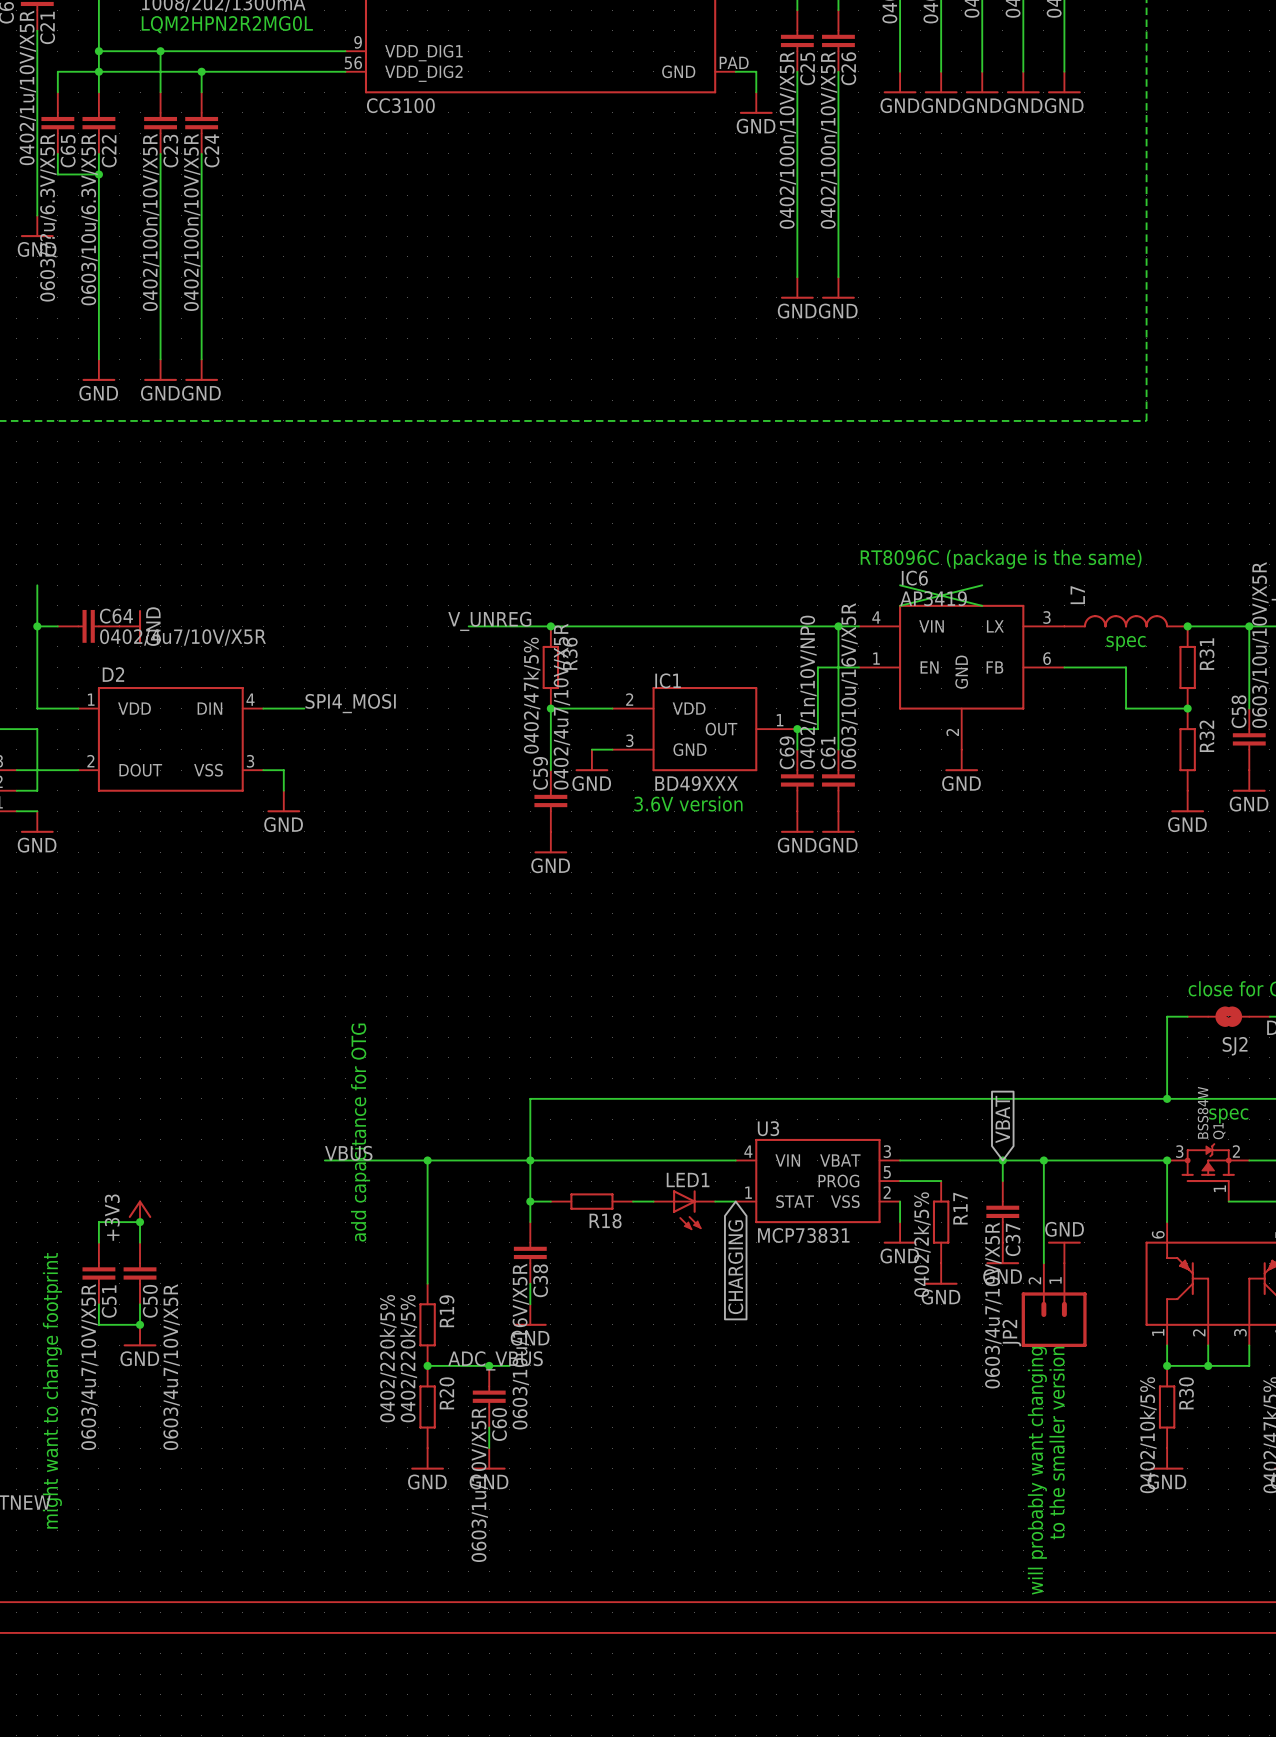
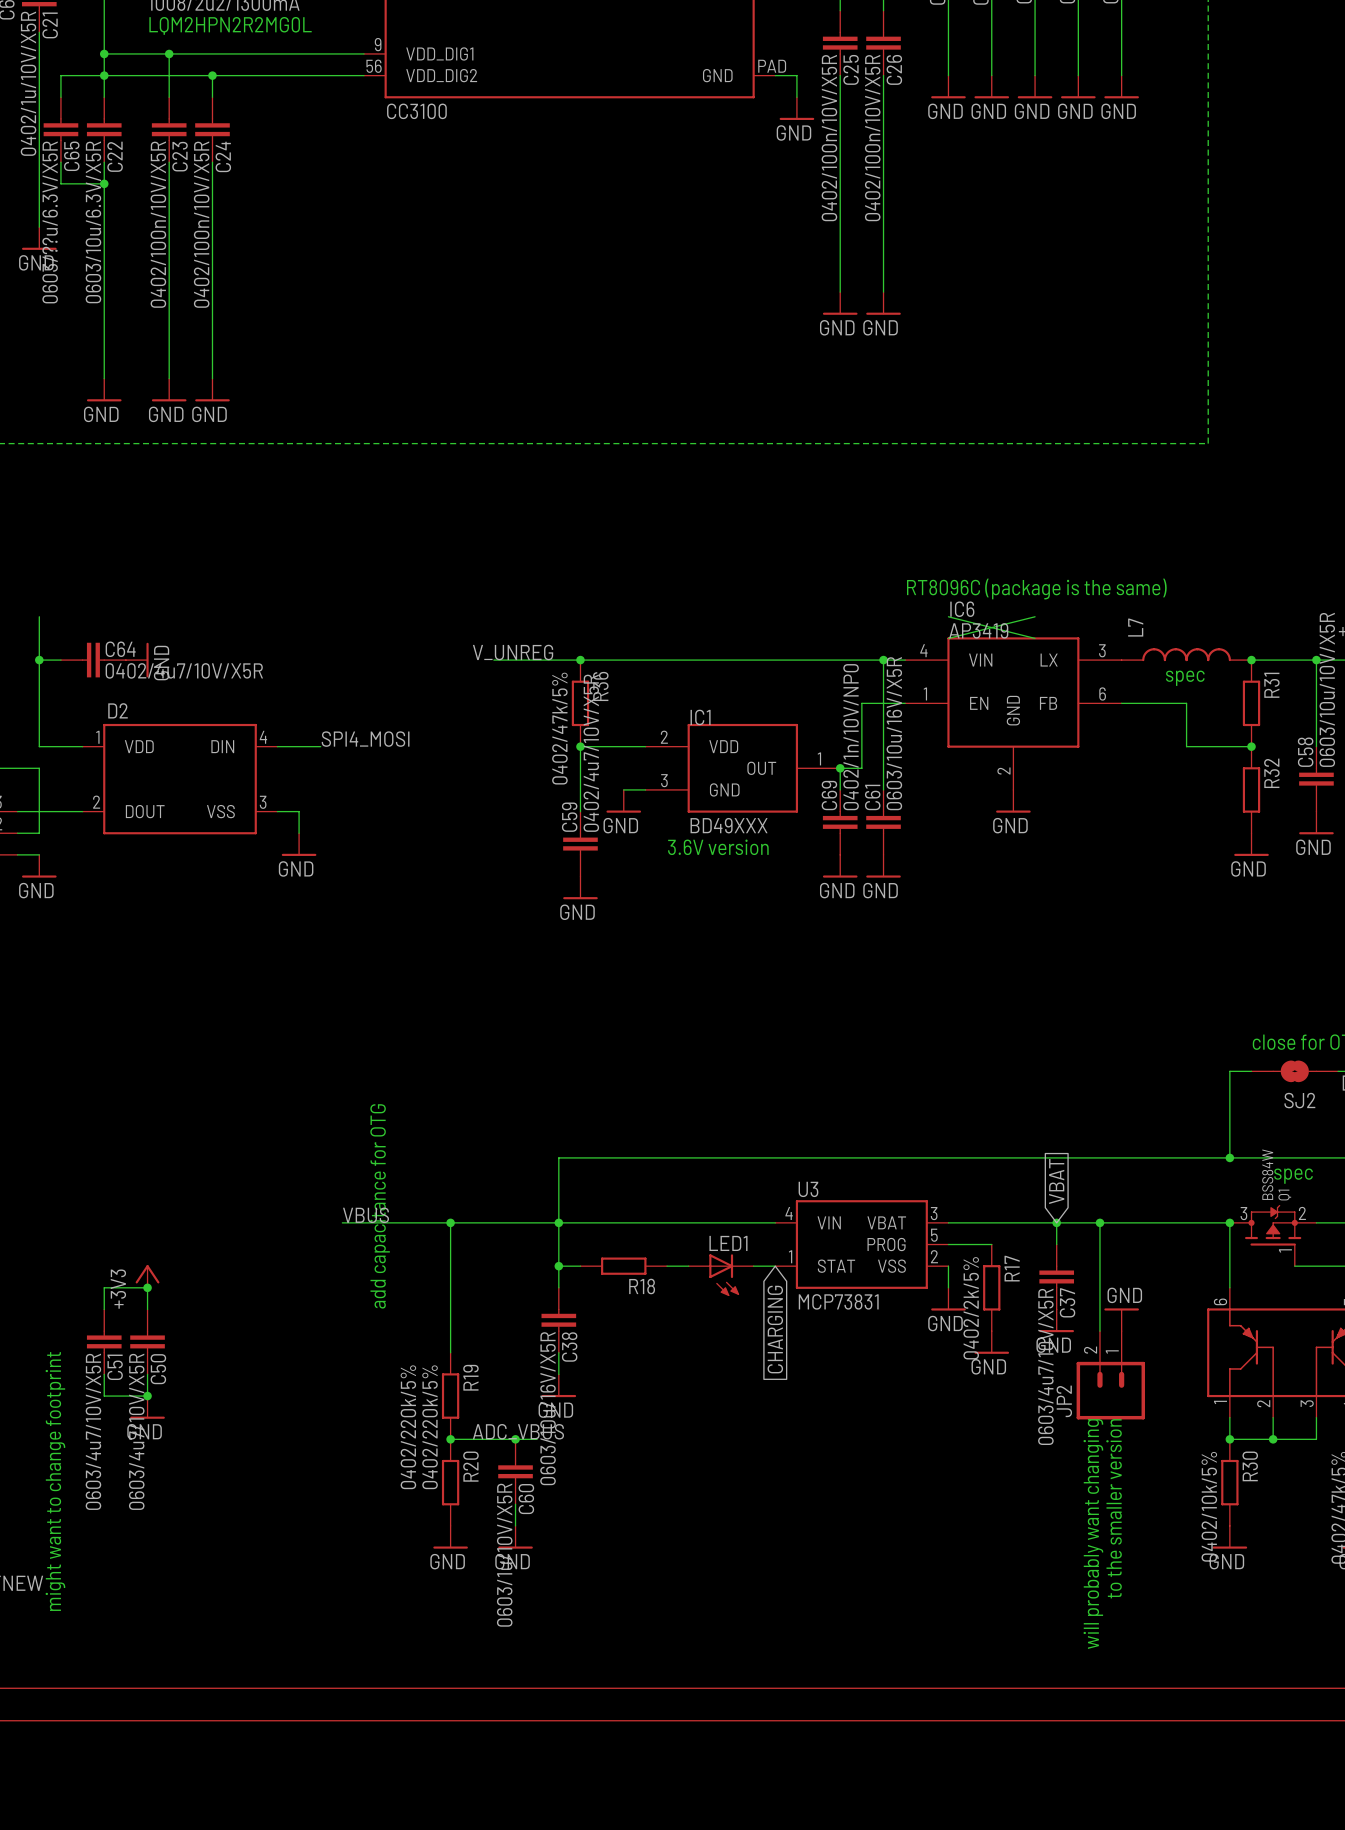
C50 value position: 0603/4u7/10V/X5R (171, 1367) -> 0603/4u7/10V/X5R (136, 1431)

